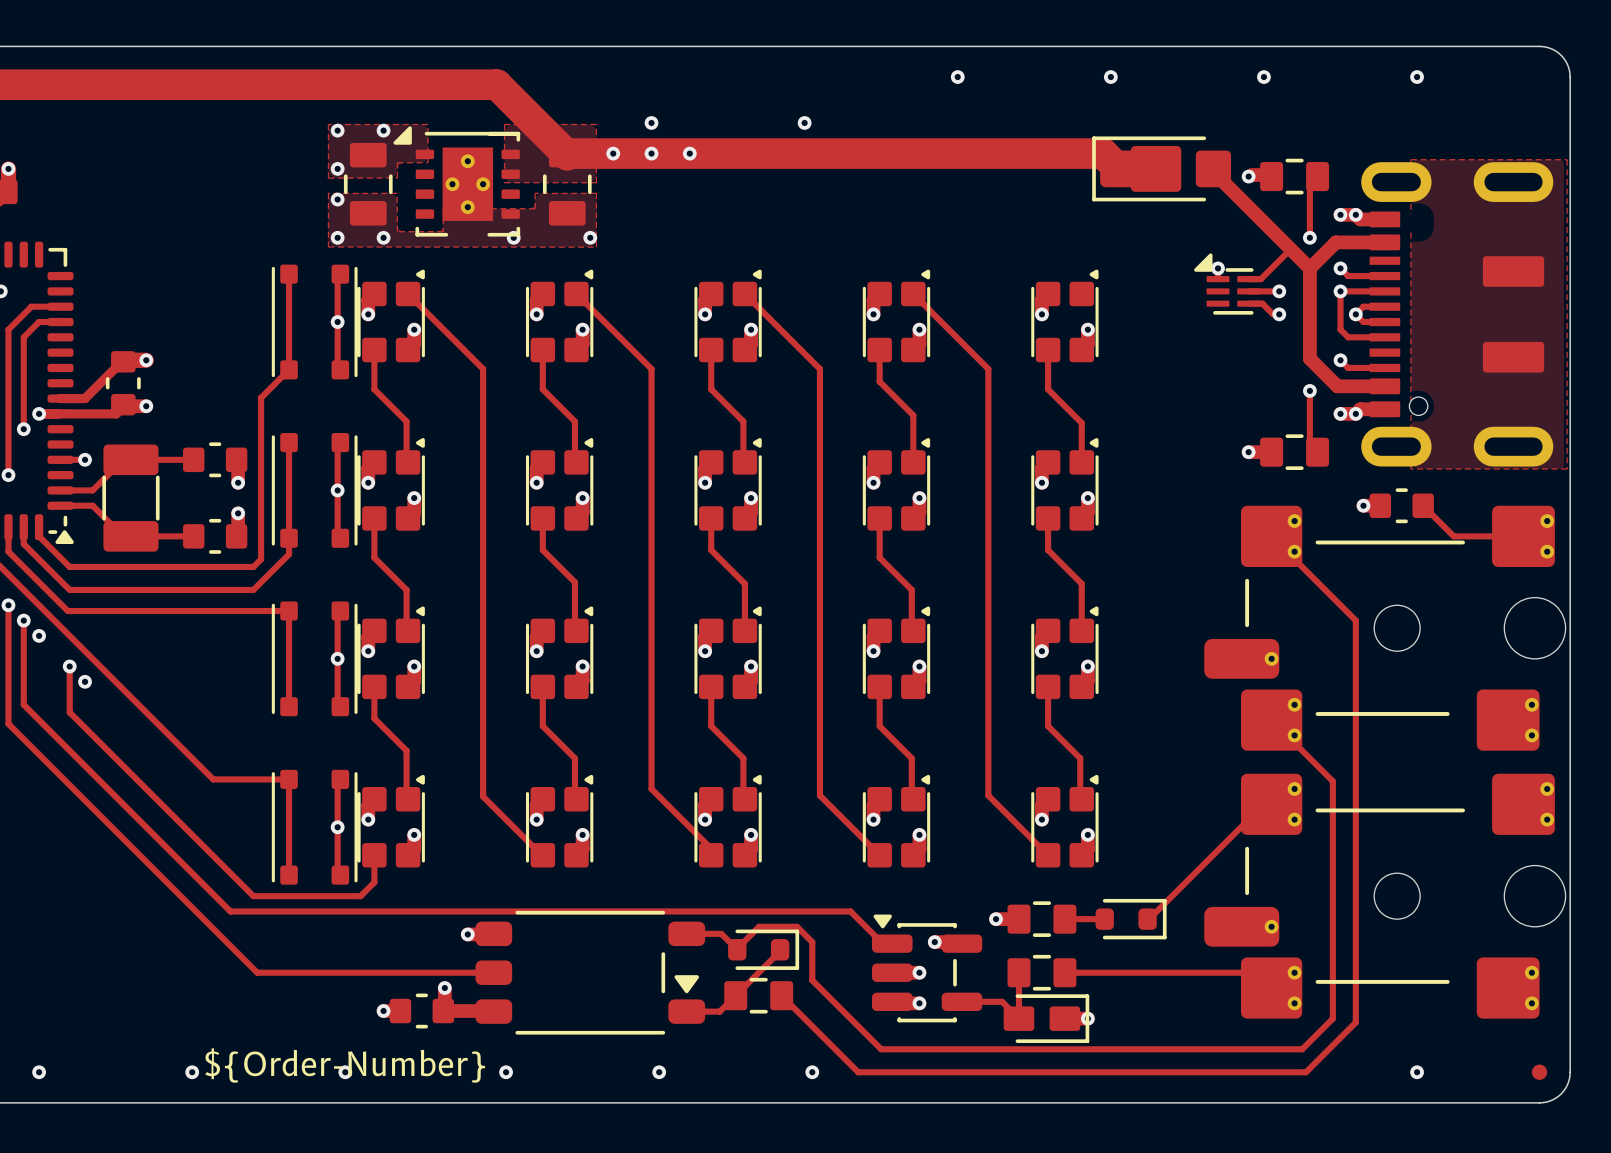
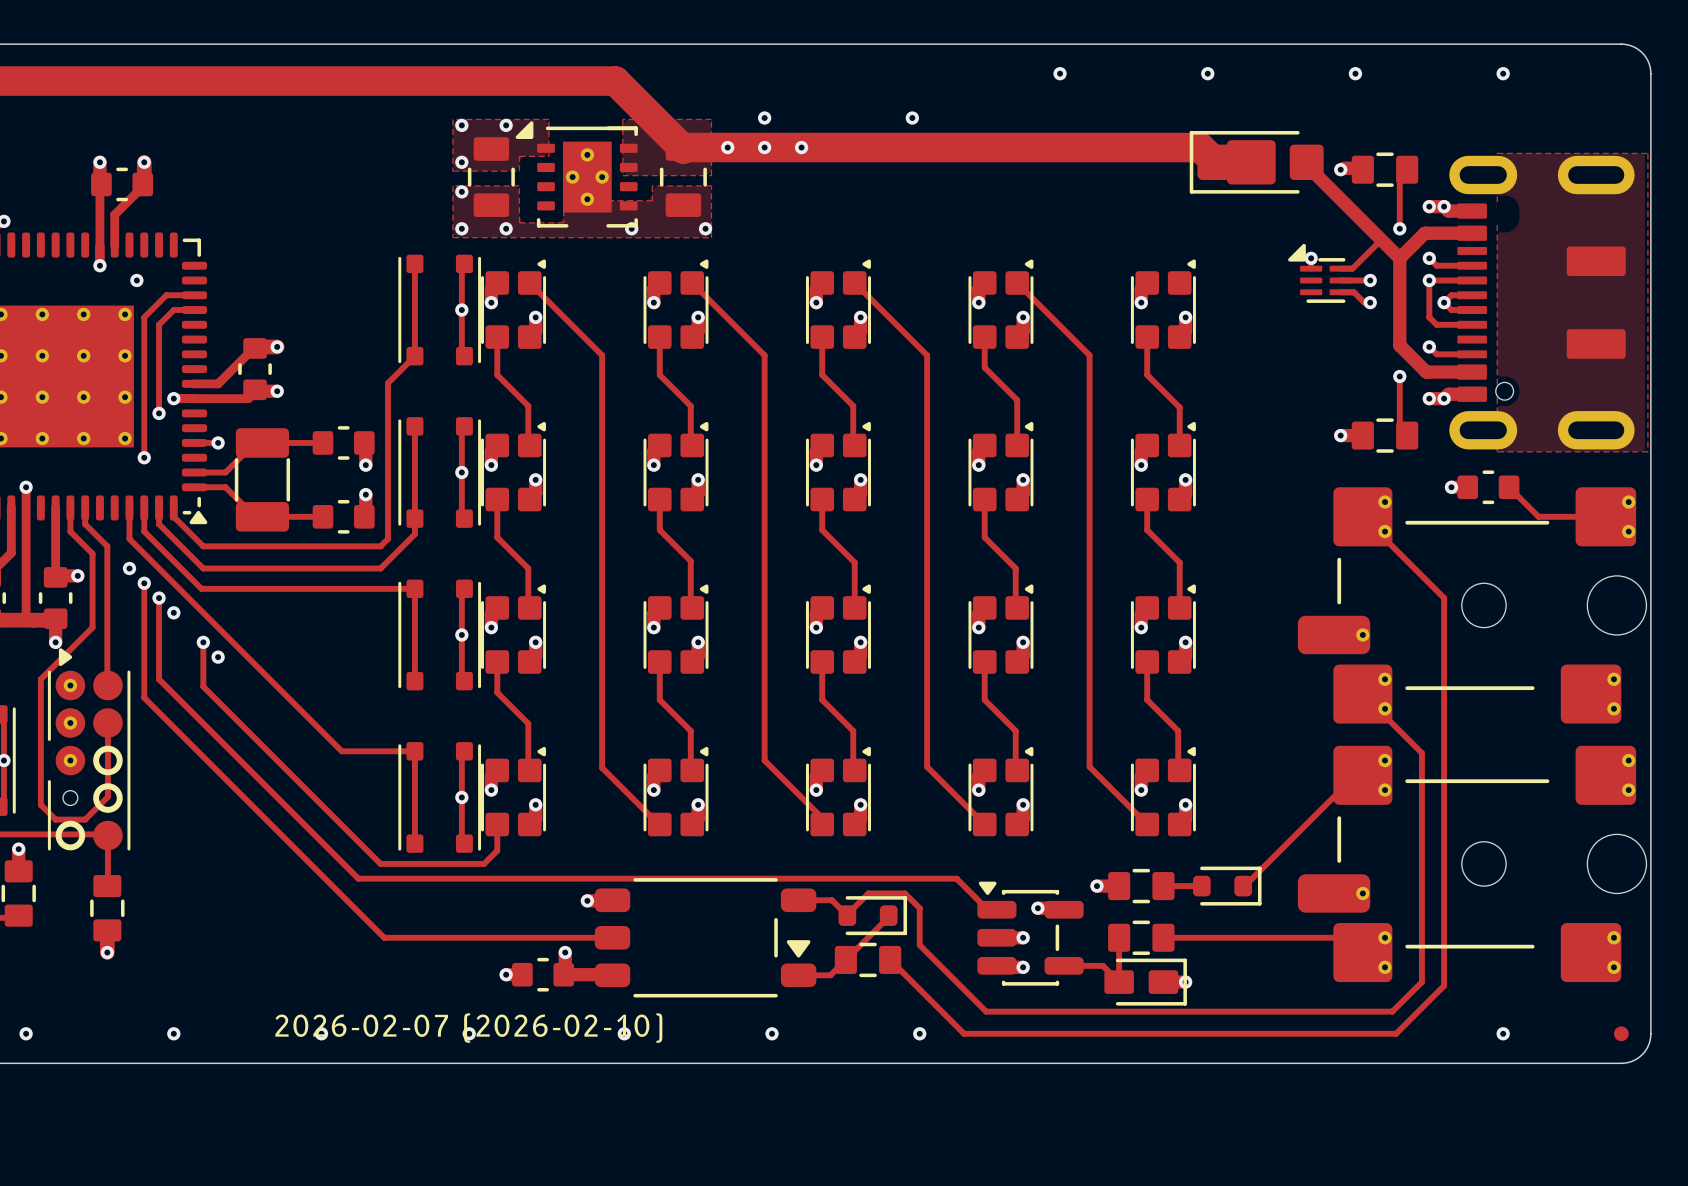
drawing shape: [205, 1048, 486, 1083] -> [275, 1013, 663, 1043]

